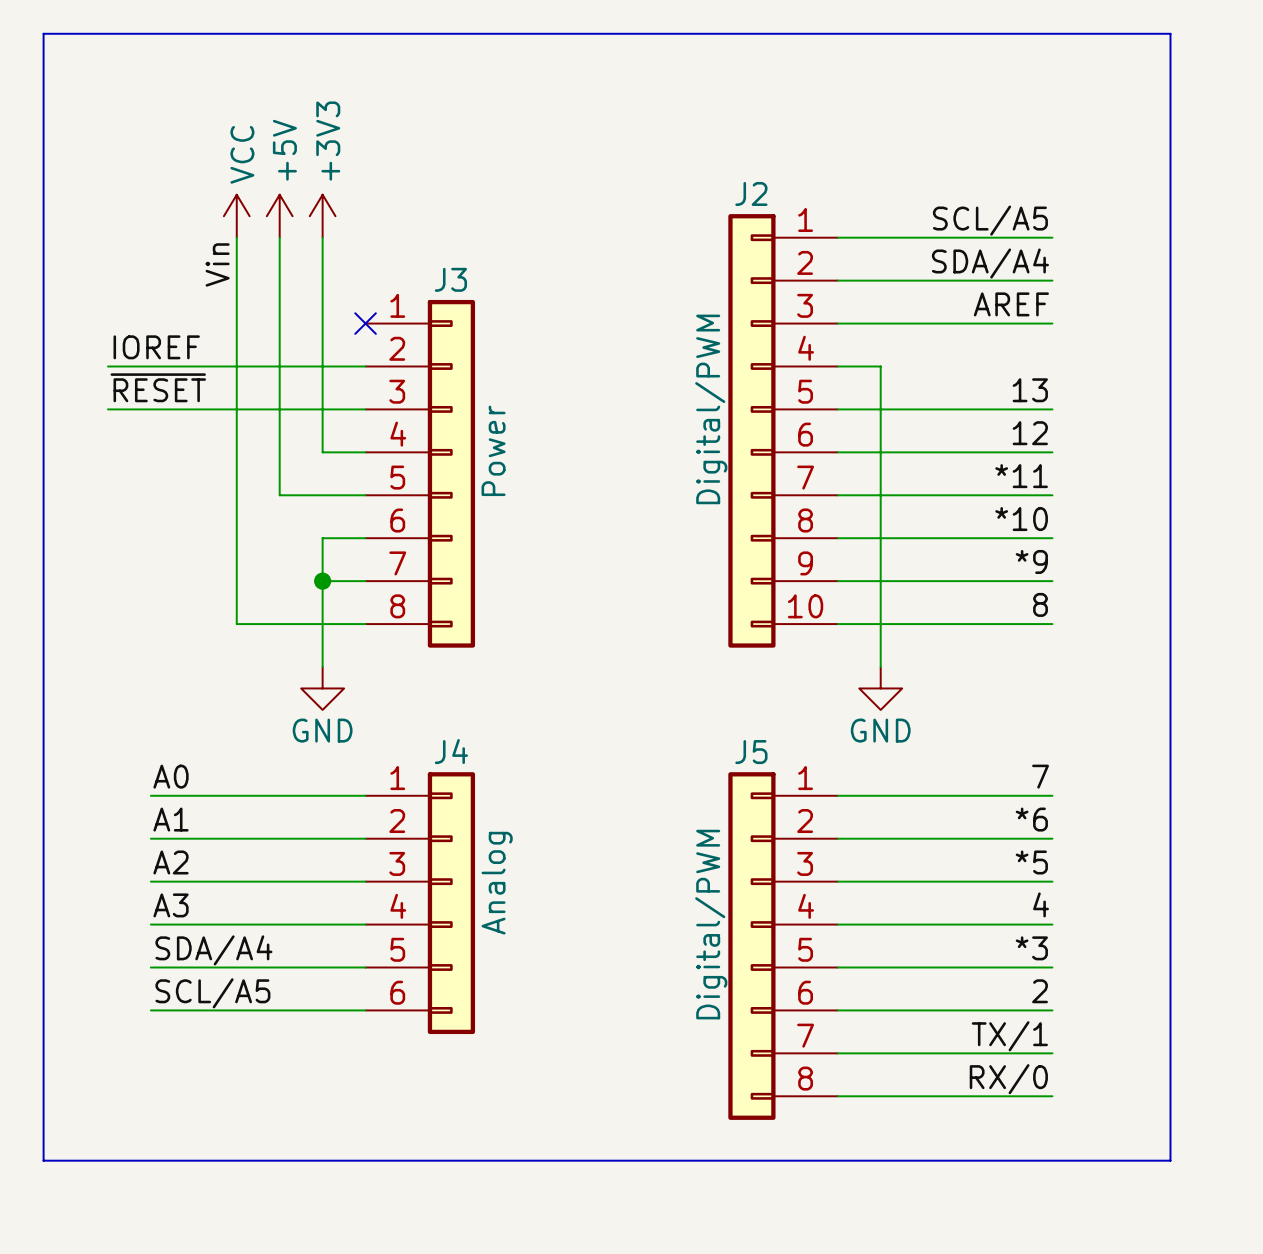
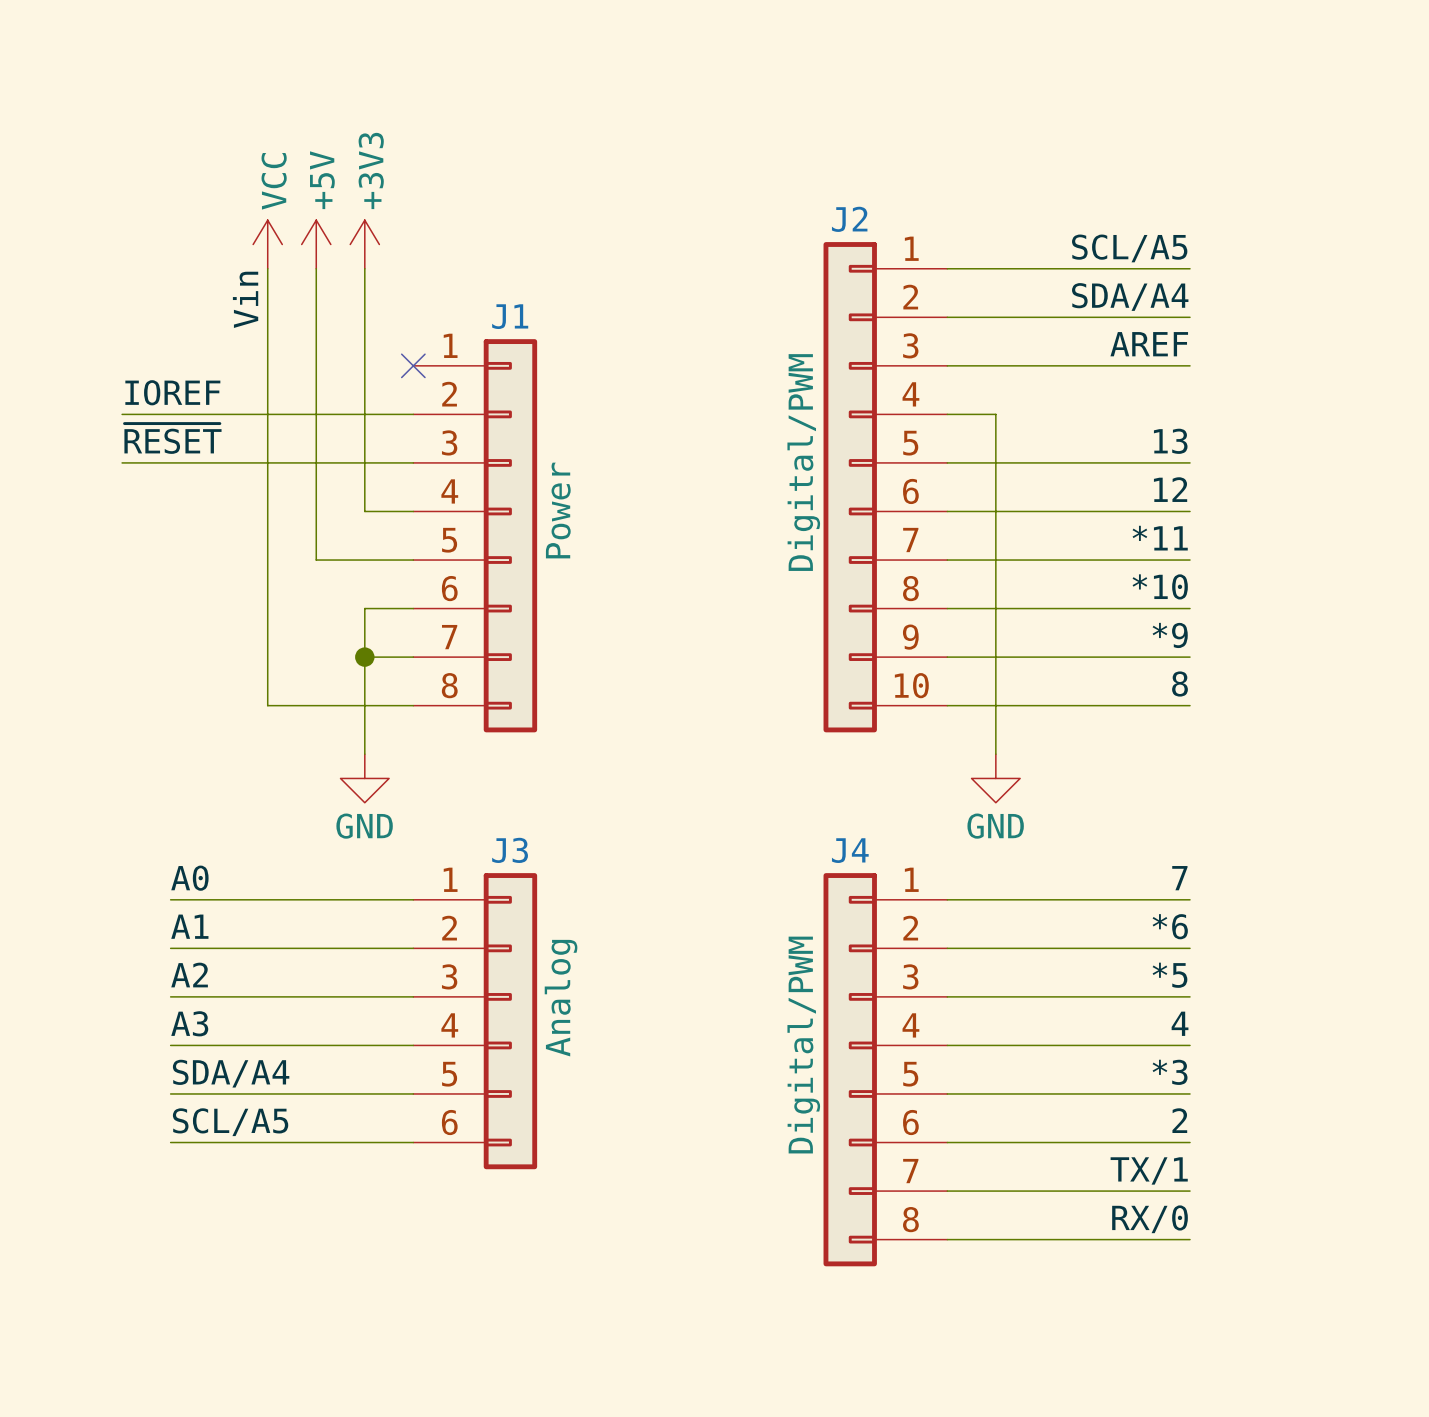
line: (43, 33) (1170, 33) (1170, 1160) (43, 1160) (43, 33) -> none
J3 name: J3 (450, 279) -> J1 (510, 316)
J4 name: J4 (451, 751) -> J3 (510, 850)
J5 name: J5 (751, 752) -> J4 (850, 850)

